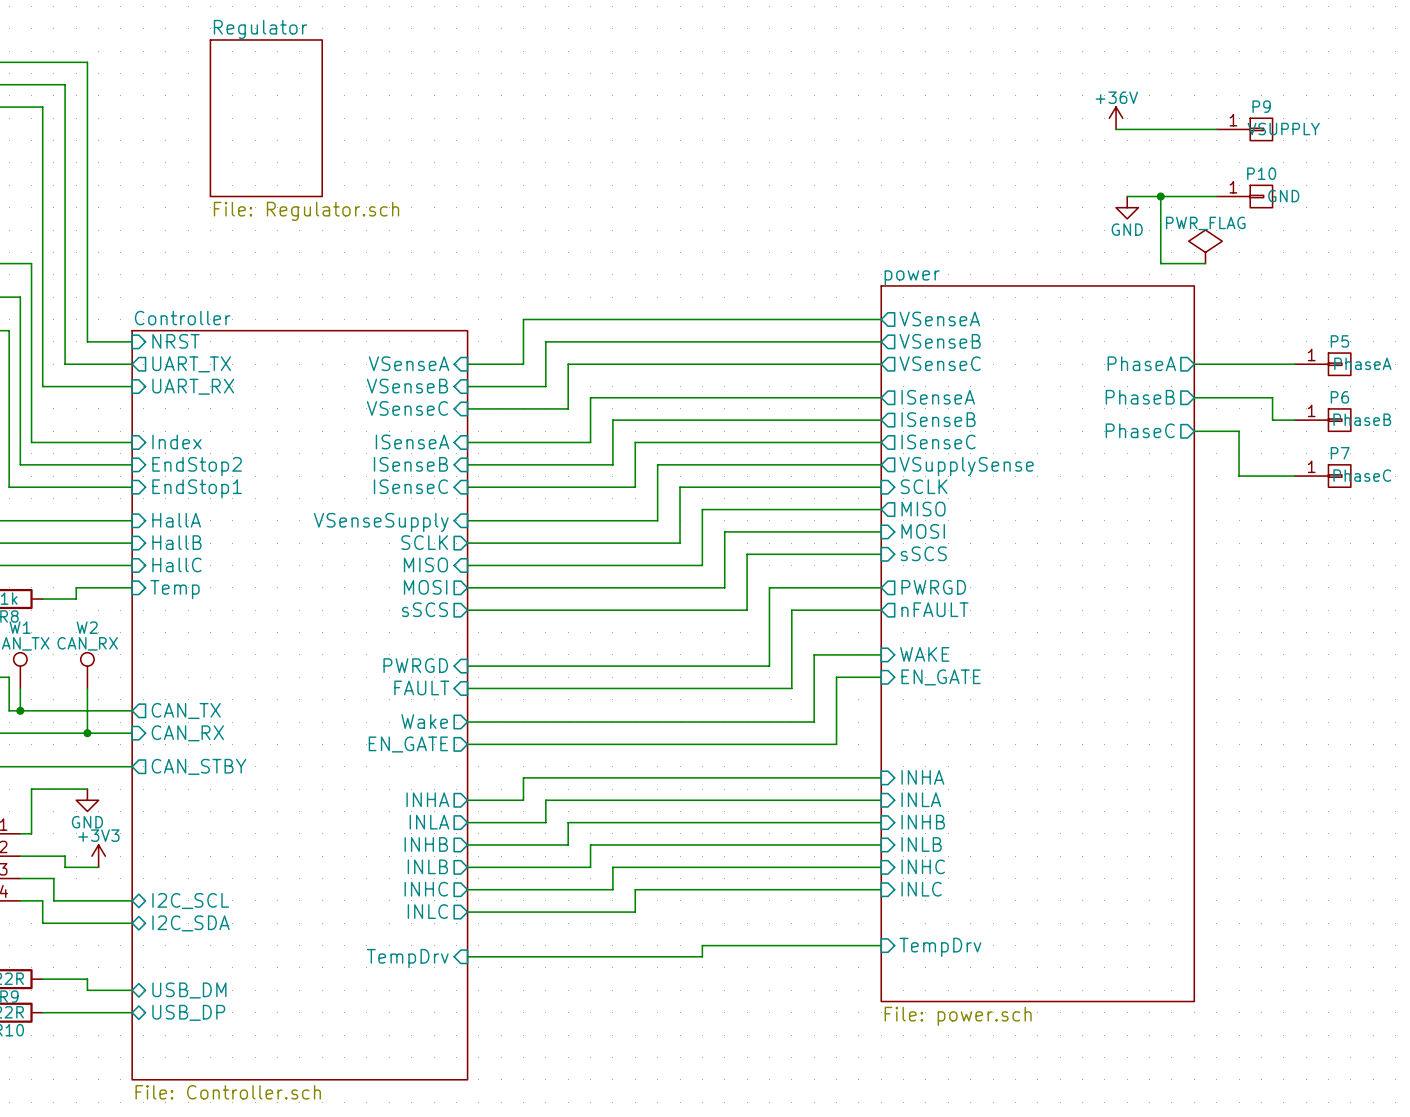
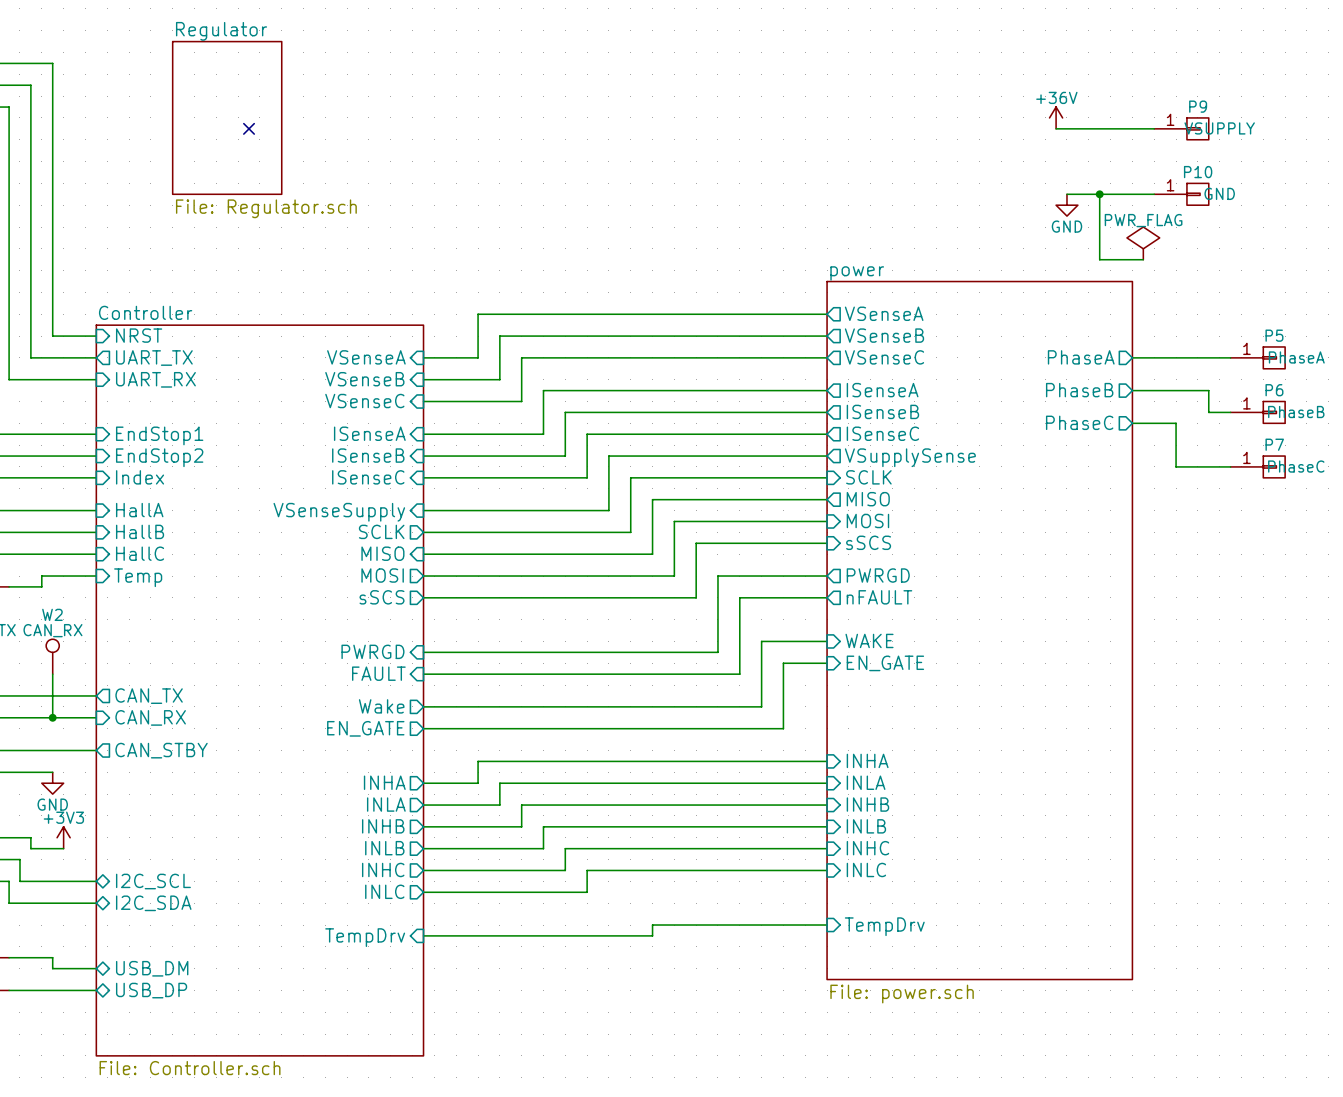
no-connect mark: none -> (249, 128)
sheet pin: Index (176, 441) -> EndStop1 (159, 435)
sheet pin: EndStop1 (197, 488) -> Index (140, 477)

